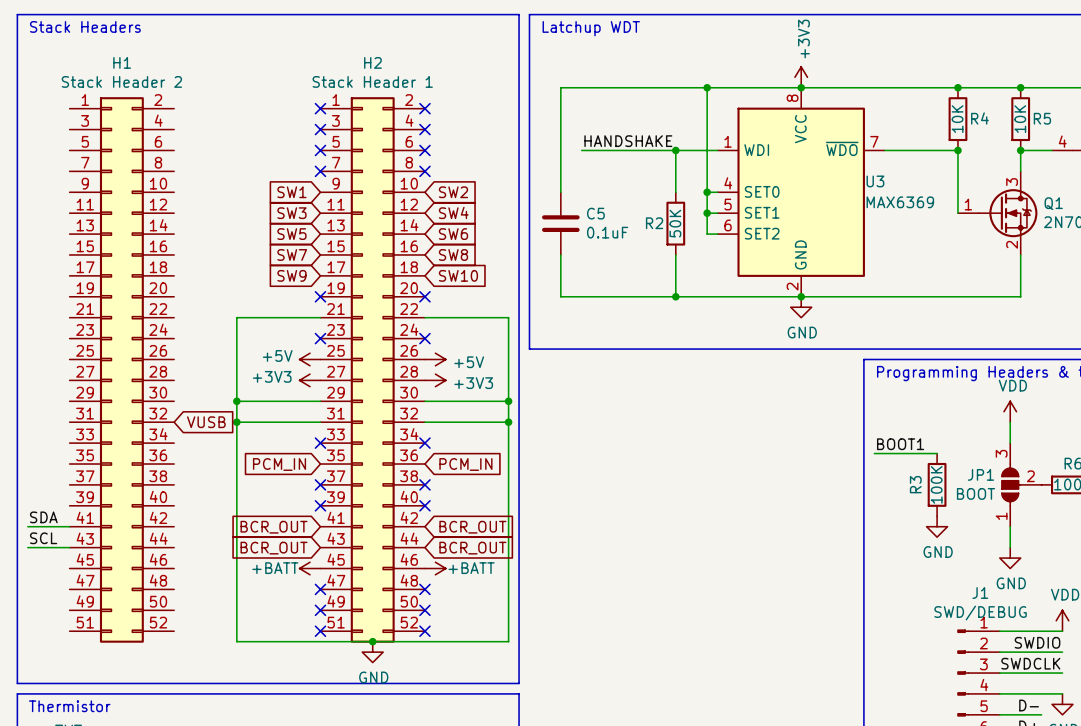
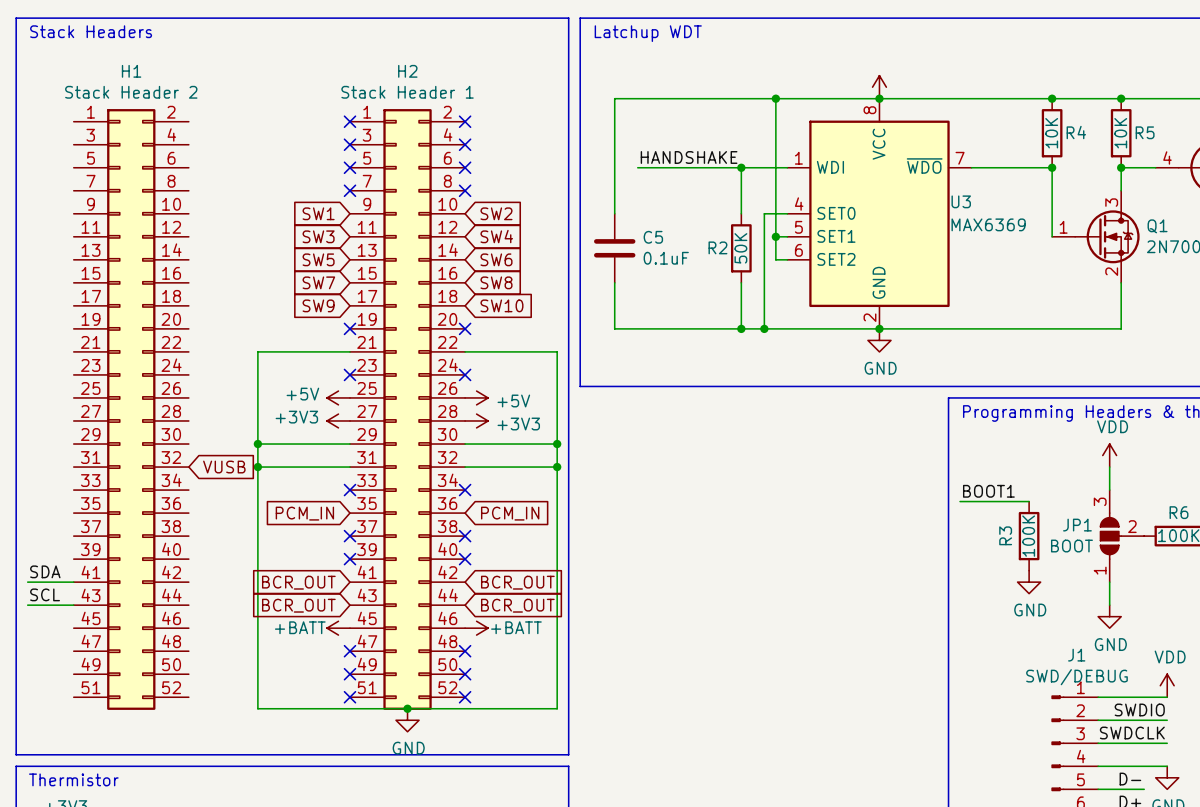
power symbol text: +3V3 (803, 39) -> none
wire: none -> (775, 213) (764, 213) (764, 328)
junction: (707, 192) -> none
junction: none -> (764, 328)

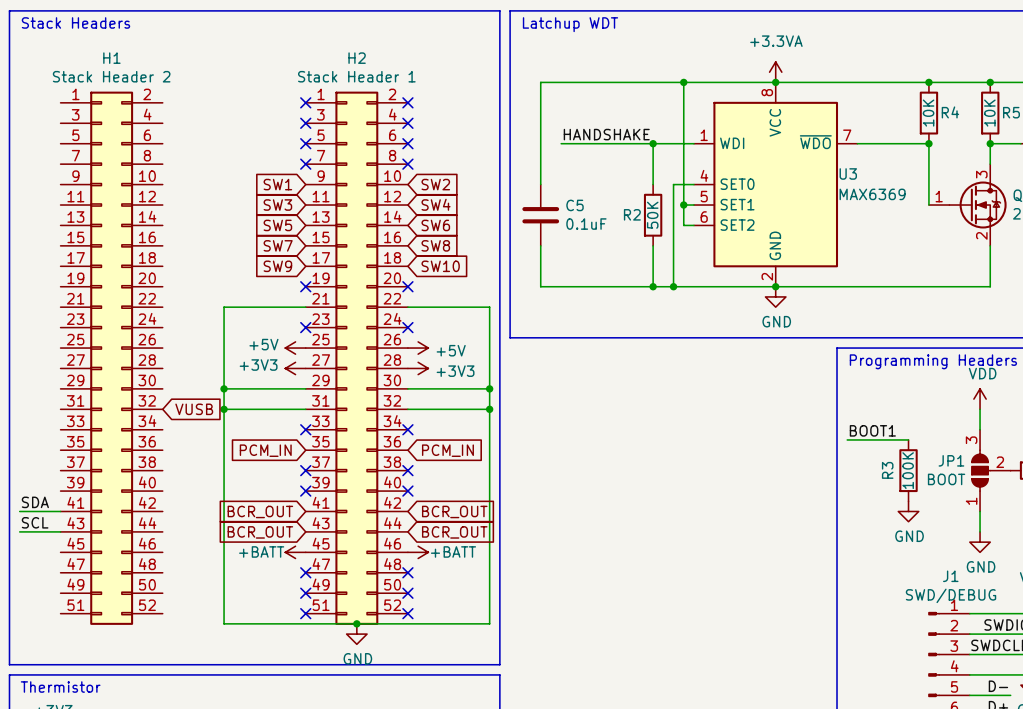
power symbol text: none -> +3.3VA (776, 41)

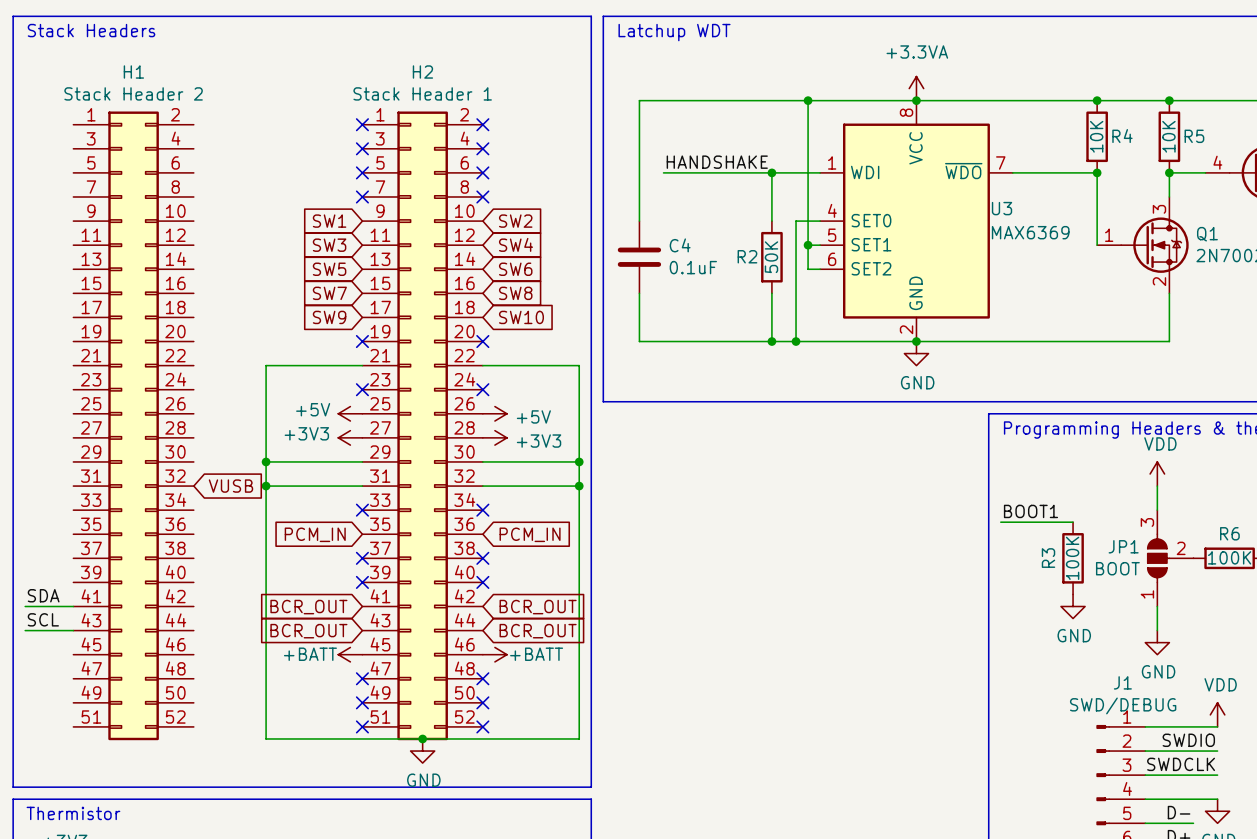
C5 name: C5 (575, 205) -> C4 (680, 245)

